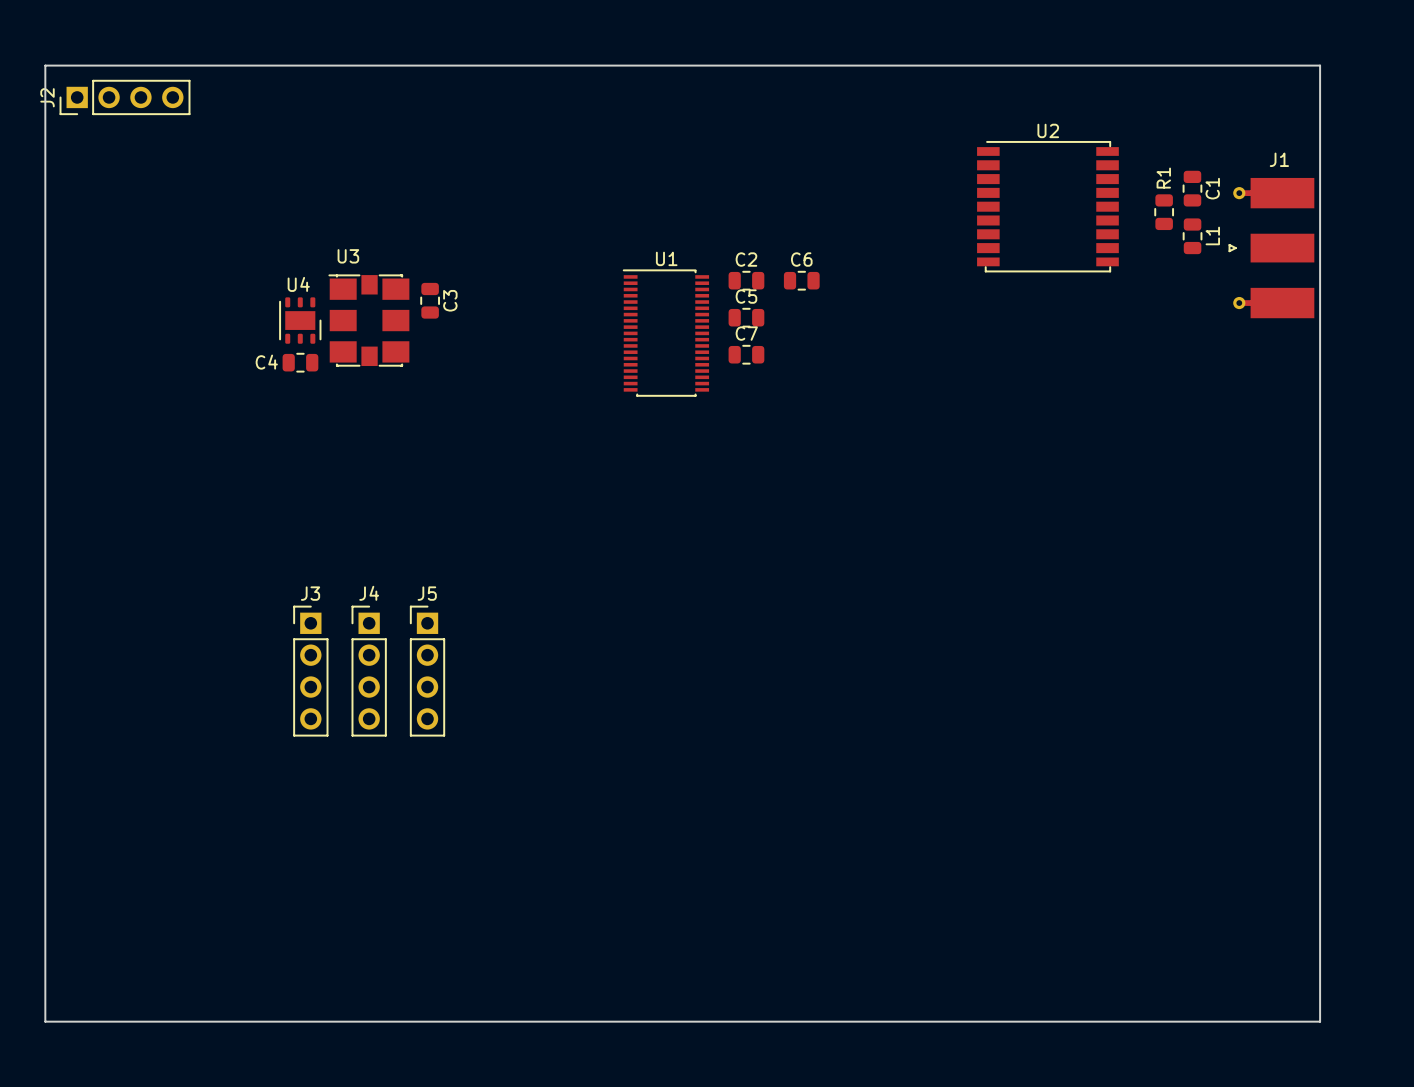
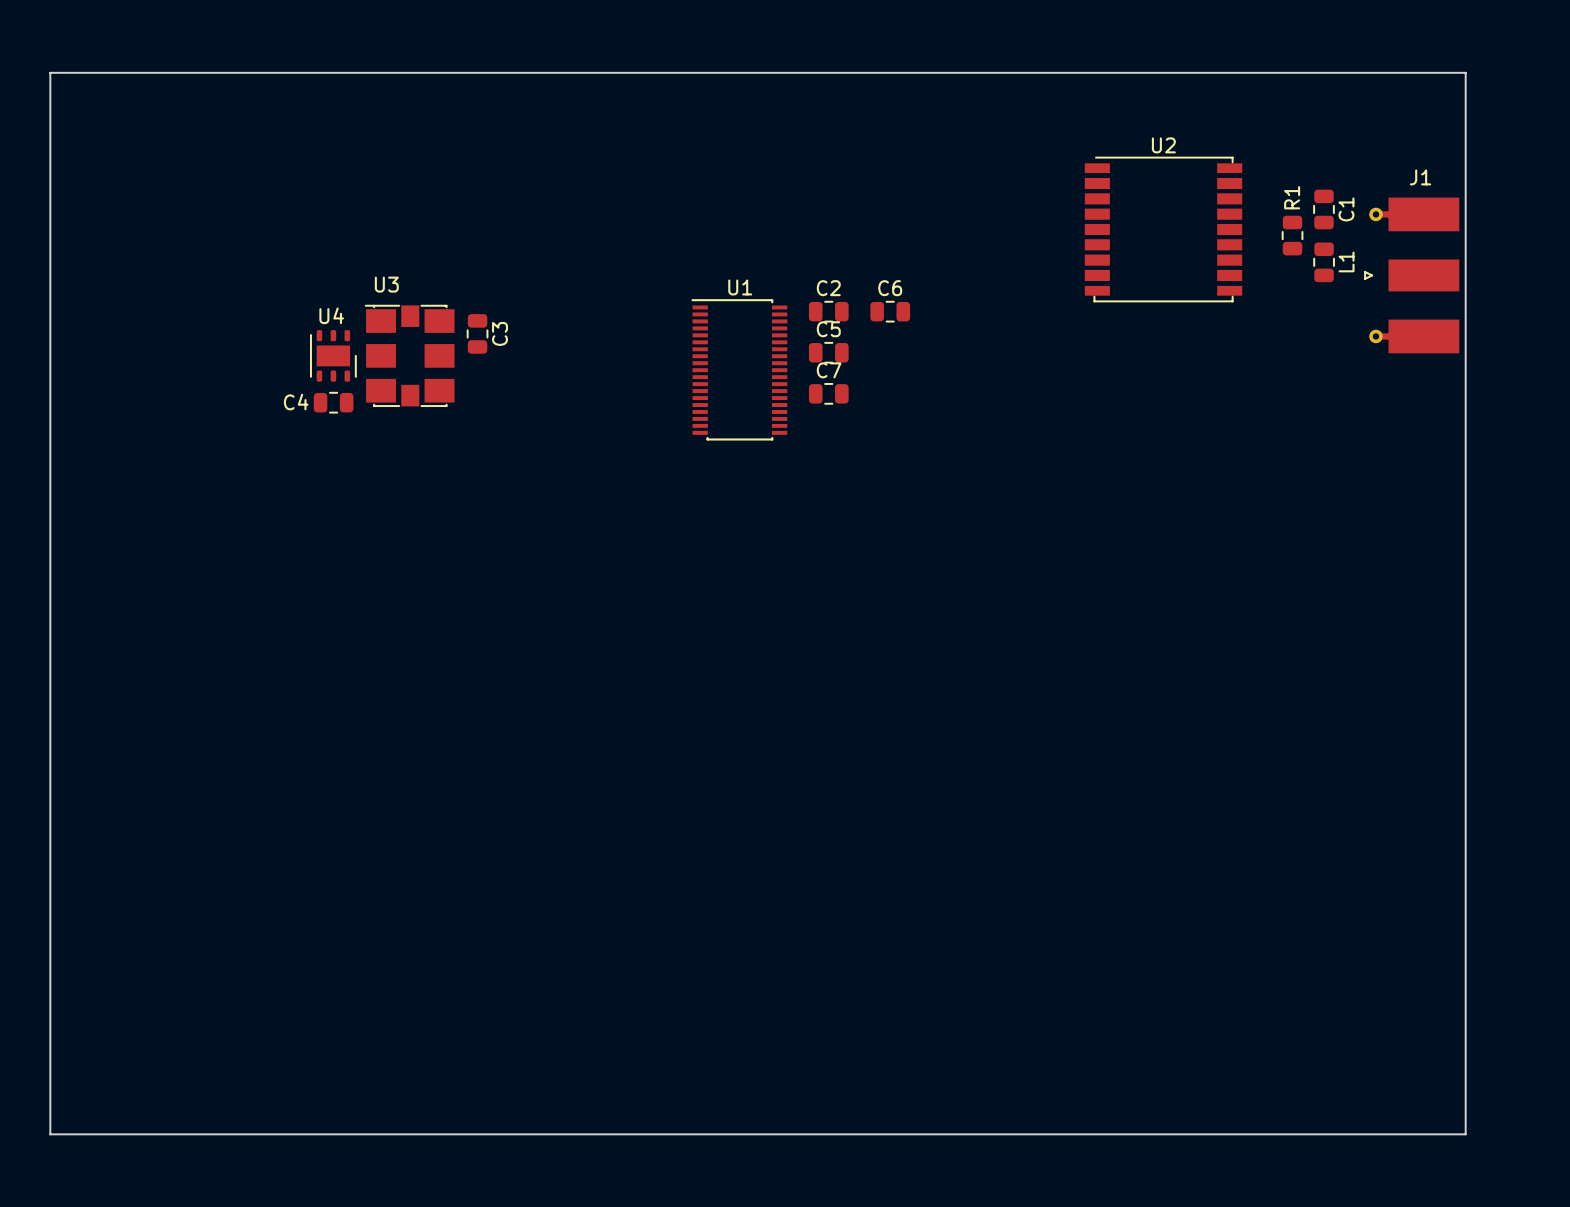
J2: (125, 97) -> none
J3: (310, 671) -> none
J4: (369, 671) -> none
J5: (427, 671) -> none

